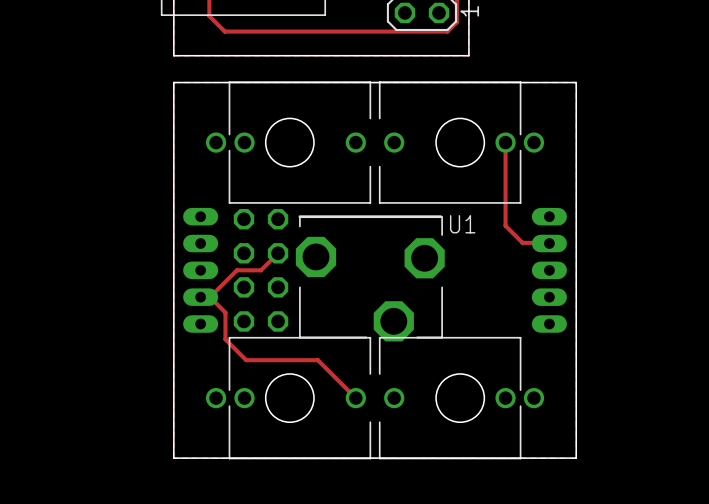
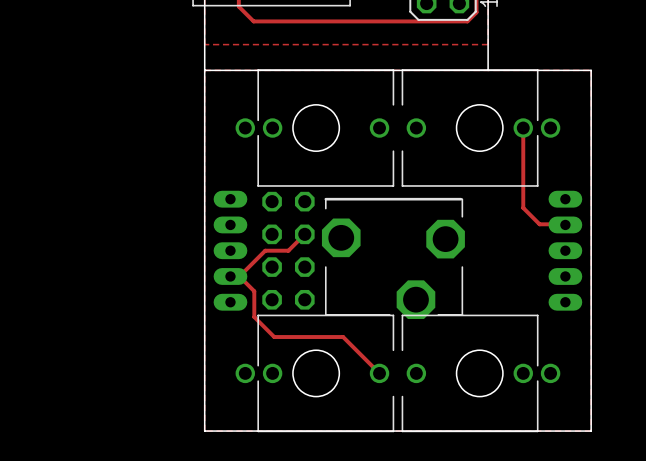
board edge: (173, 55) (468, 55) -> (204, 44) (204, 70)
board edge: none -> (488, 44) (488, 70)
U1 name: U1 (462, 224) -> none

